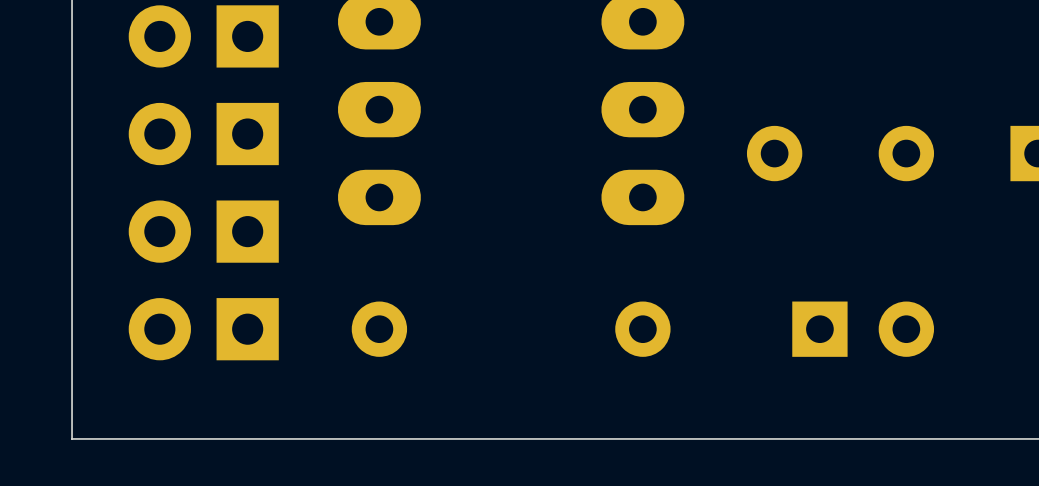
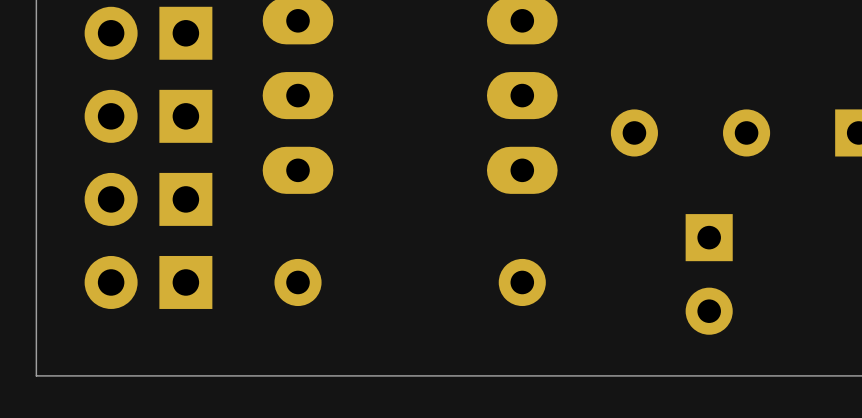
part rotation: 0° (863, 329) -> 90° clockwise (709, 274)

